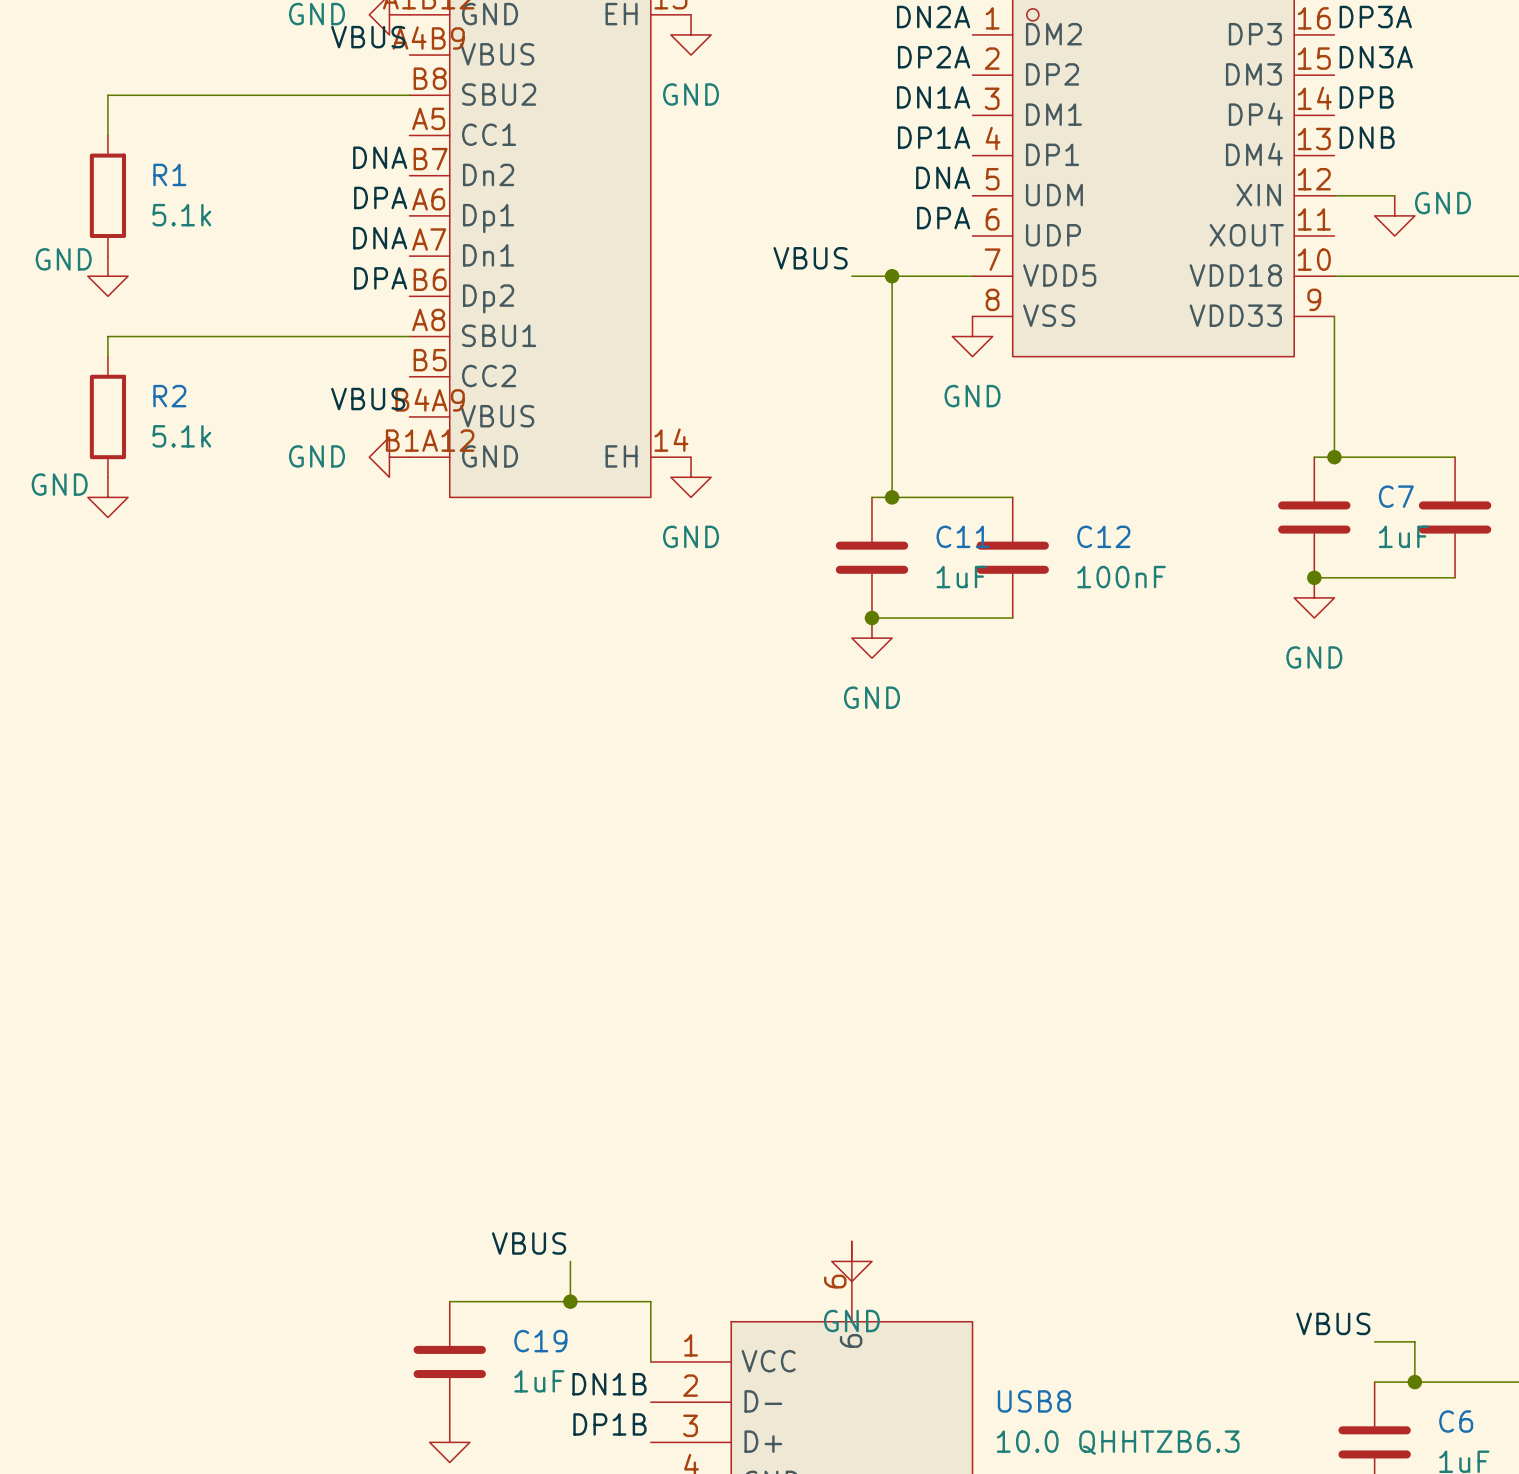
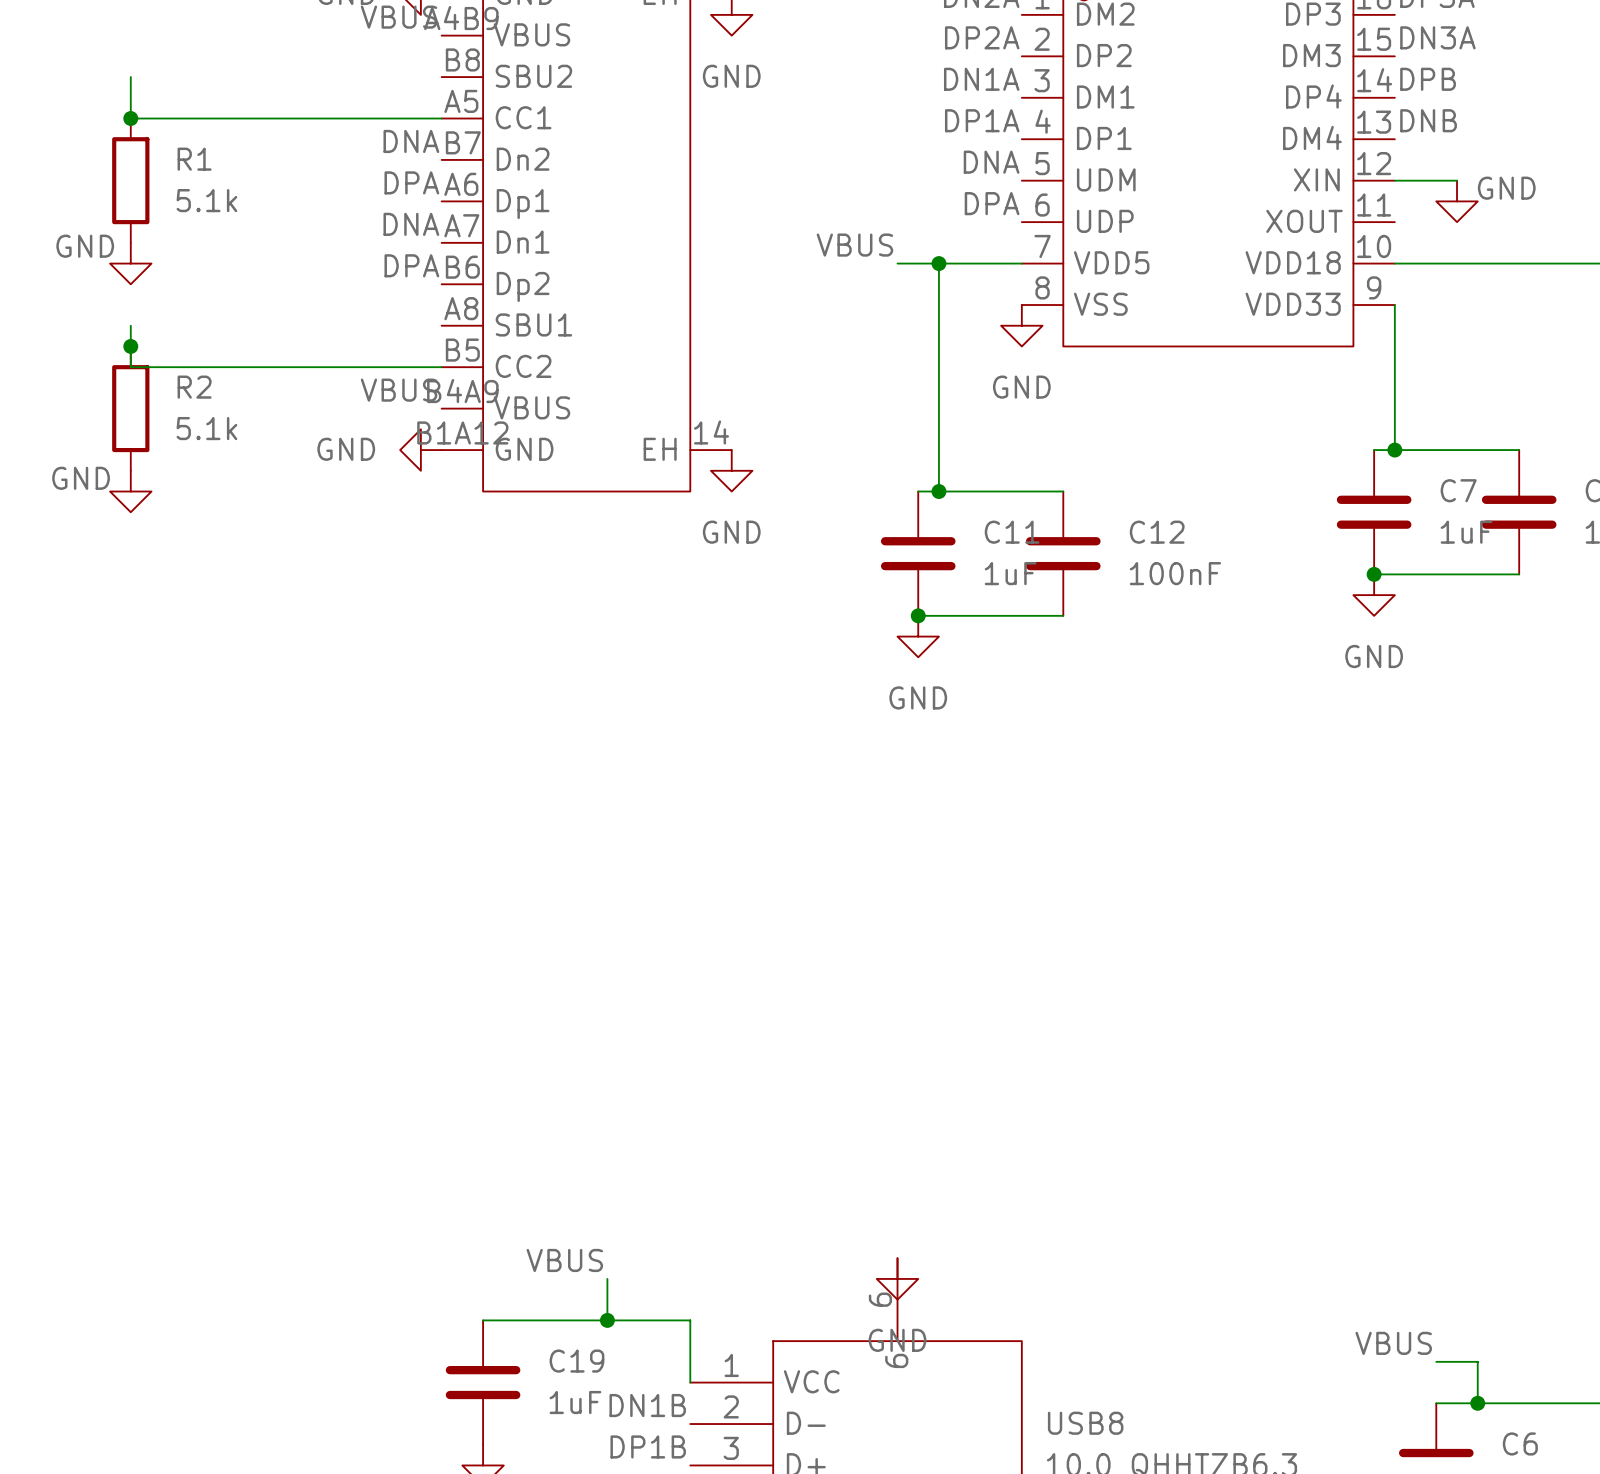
wire: (107, 95) (409, 95) -> (130, 118) (441, 118)
junction: none -> (130, 118)
wire: (107, 336) (409, 336) -> none
wire: none -> (130, 346) (130, 367) (441, 367)
junction: none -> (130, 346)

